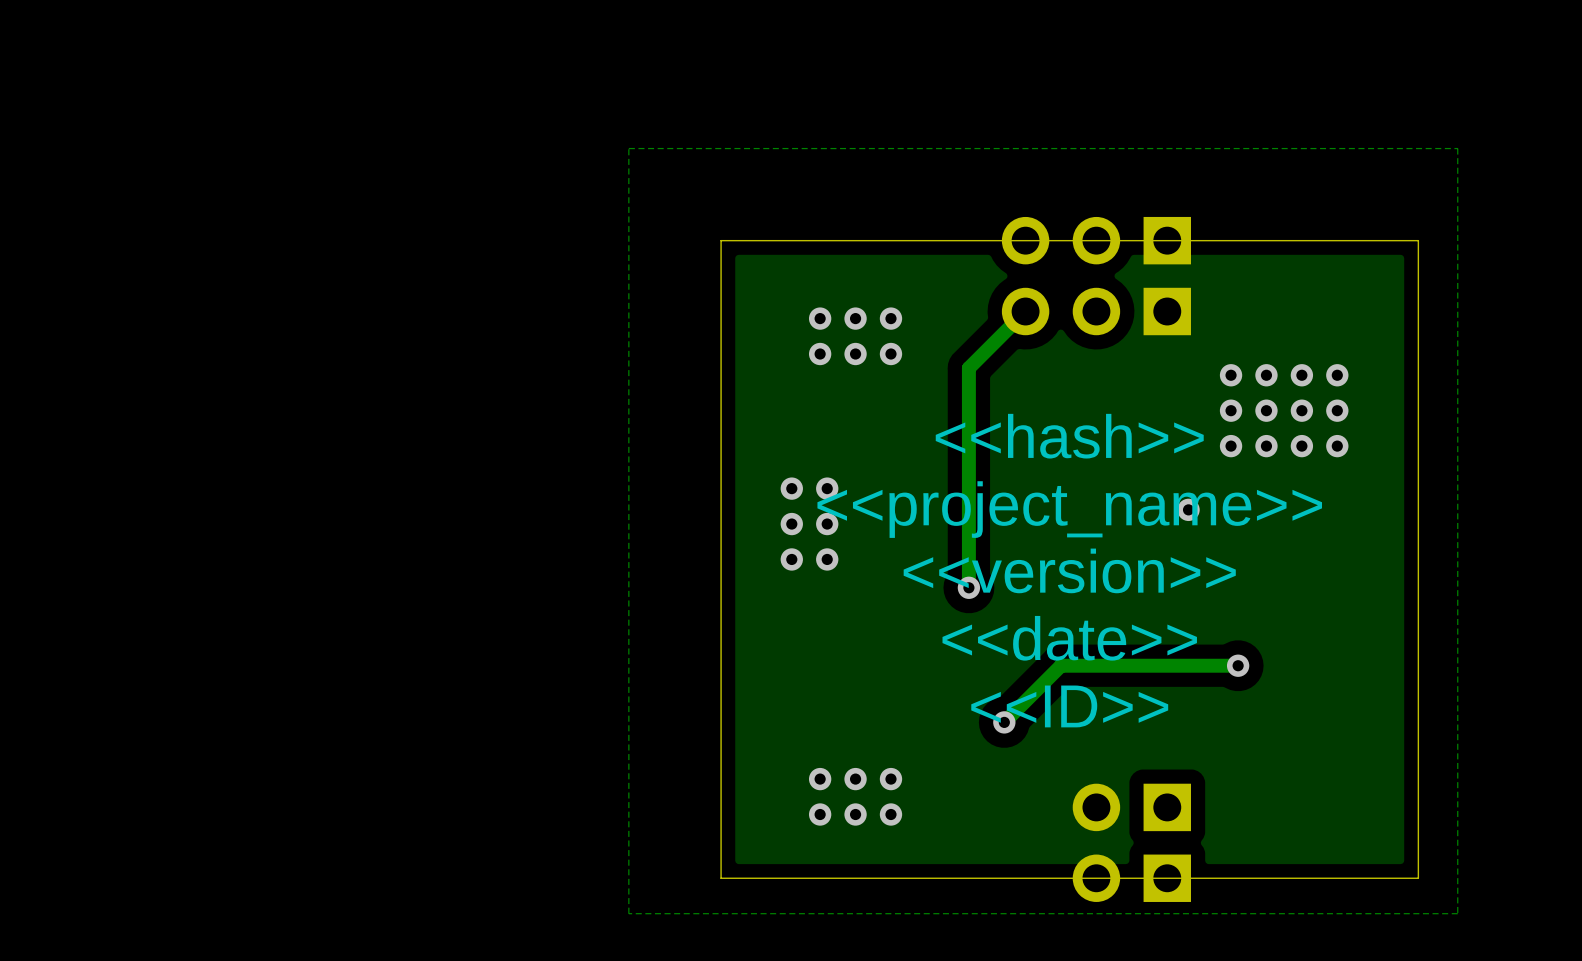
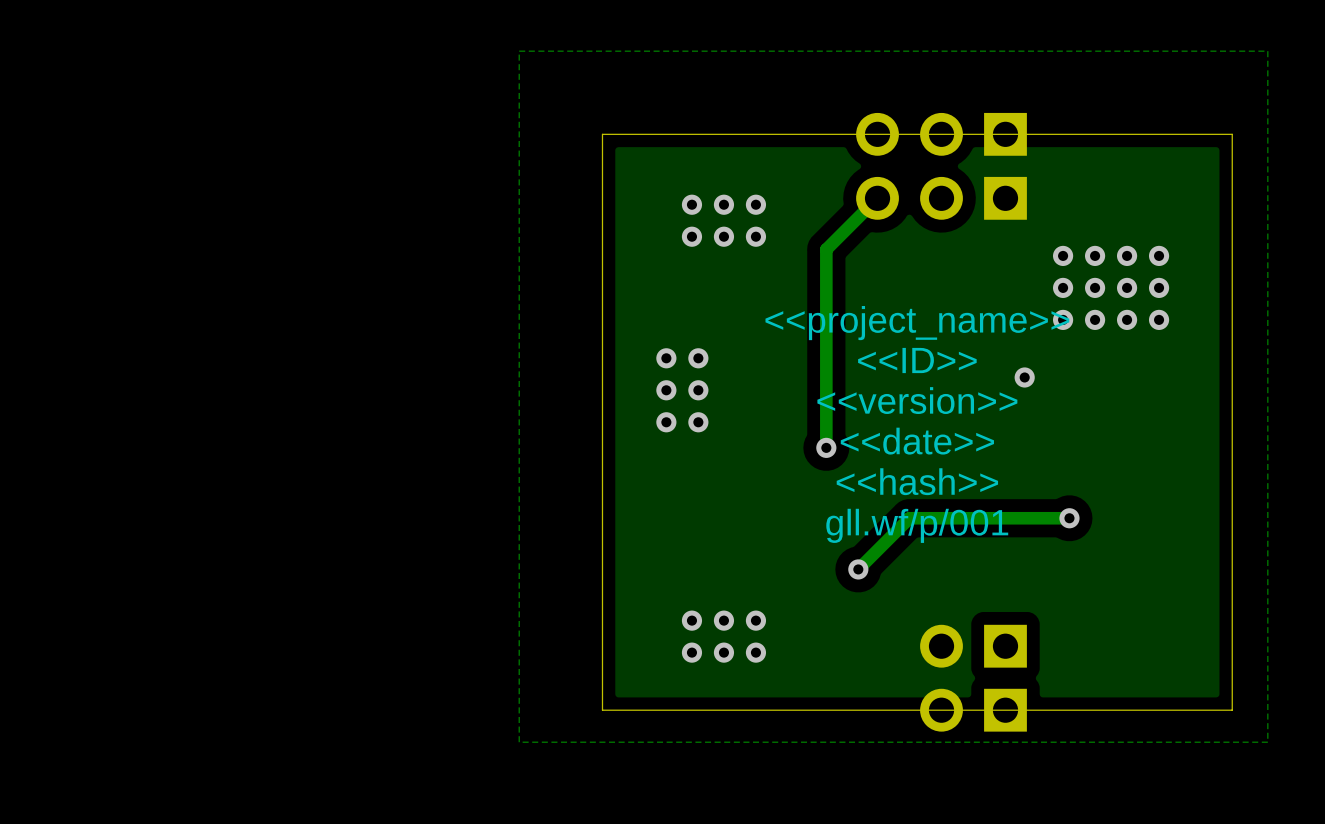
text: <<hash>> (1069, 436) -> <<project_name>> (917, 323)
text: <<project_name>> (1069, 509) -> <<ID>> (917, 360)
text: none -> <<version>> (917, 400)
text: <<version>> (1069, 570) -> <<date>> (917, 441)
text: <<date>> (1069, 638) -> <<hash>> (917, 481)
text: none -> gll.wf/p/001 (917, 525)
text: <<ID>> (1069, 706) -> none

